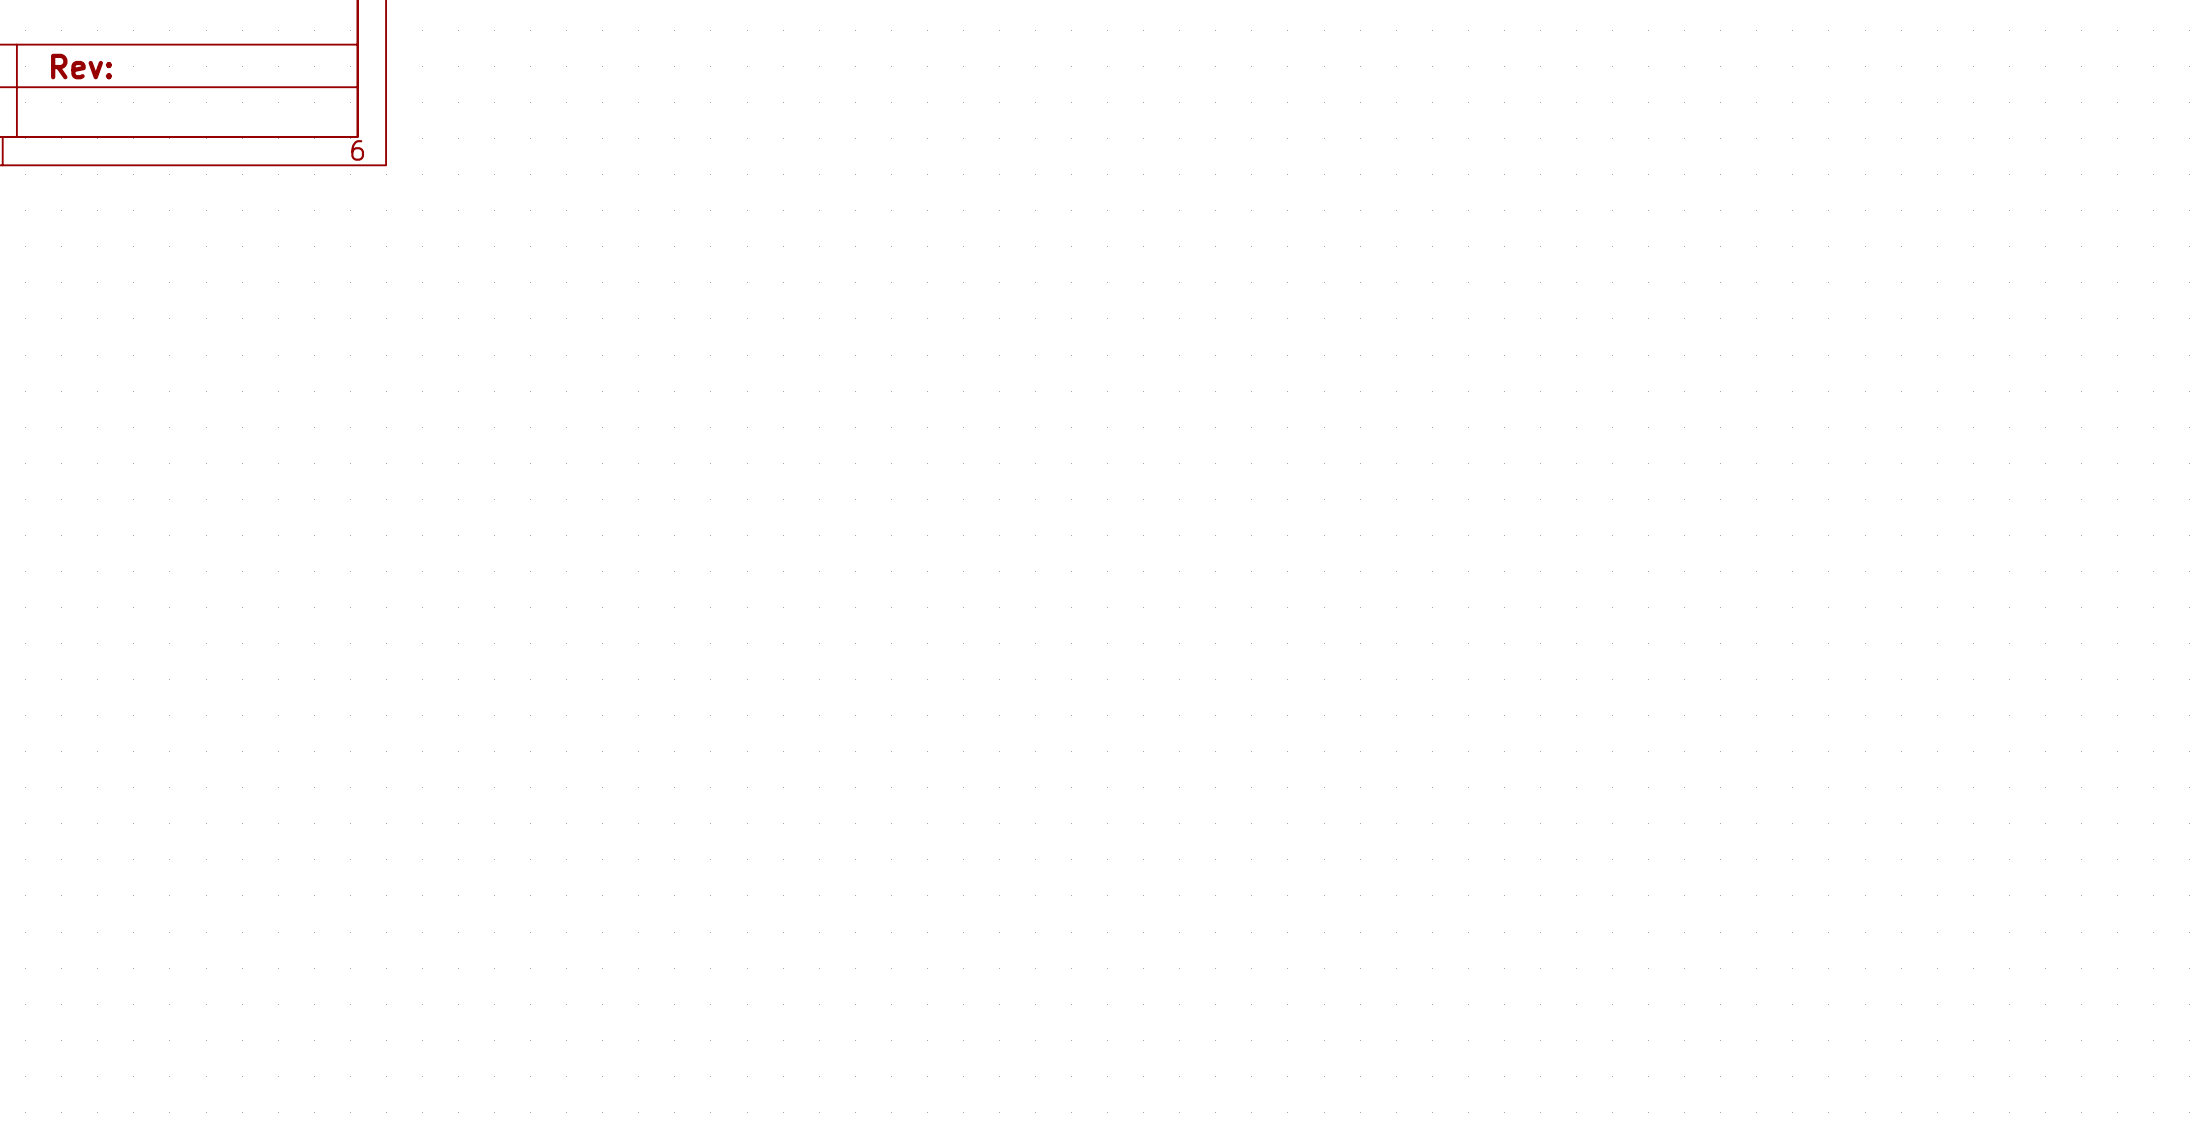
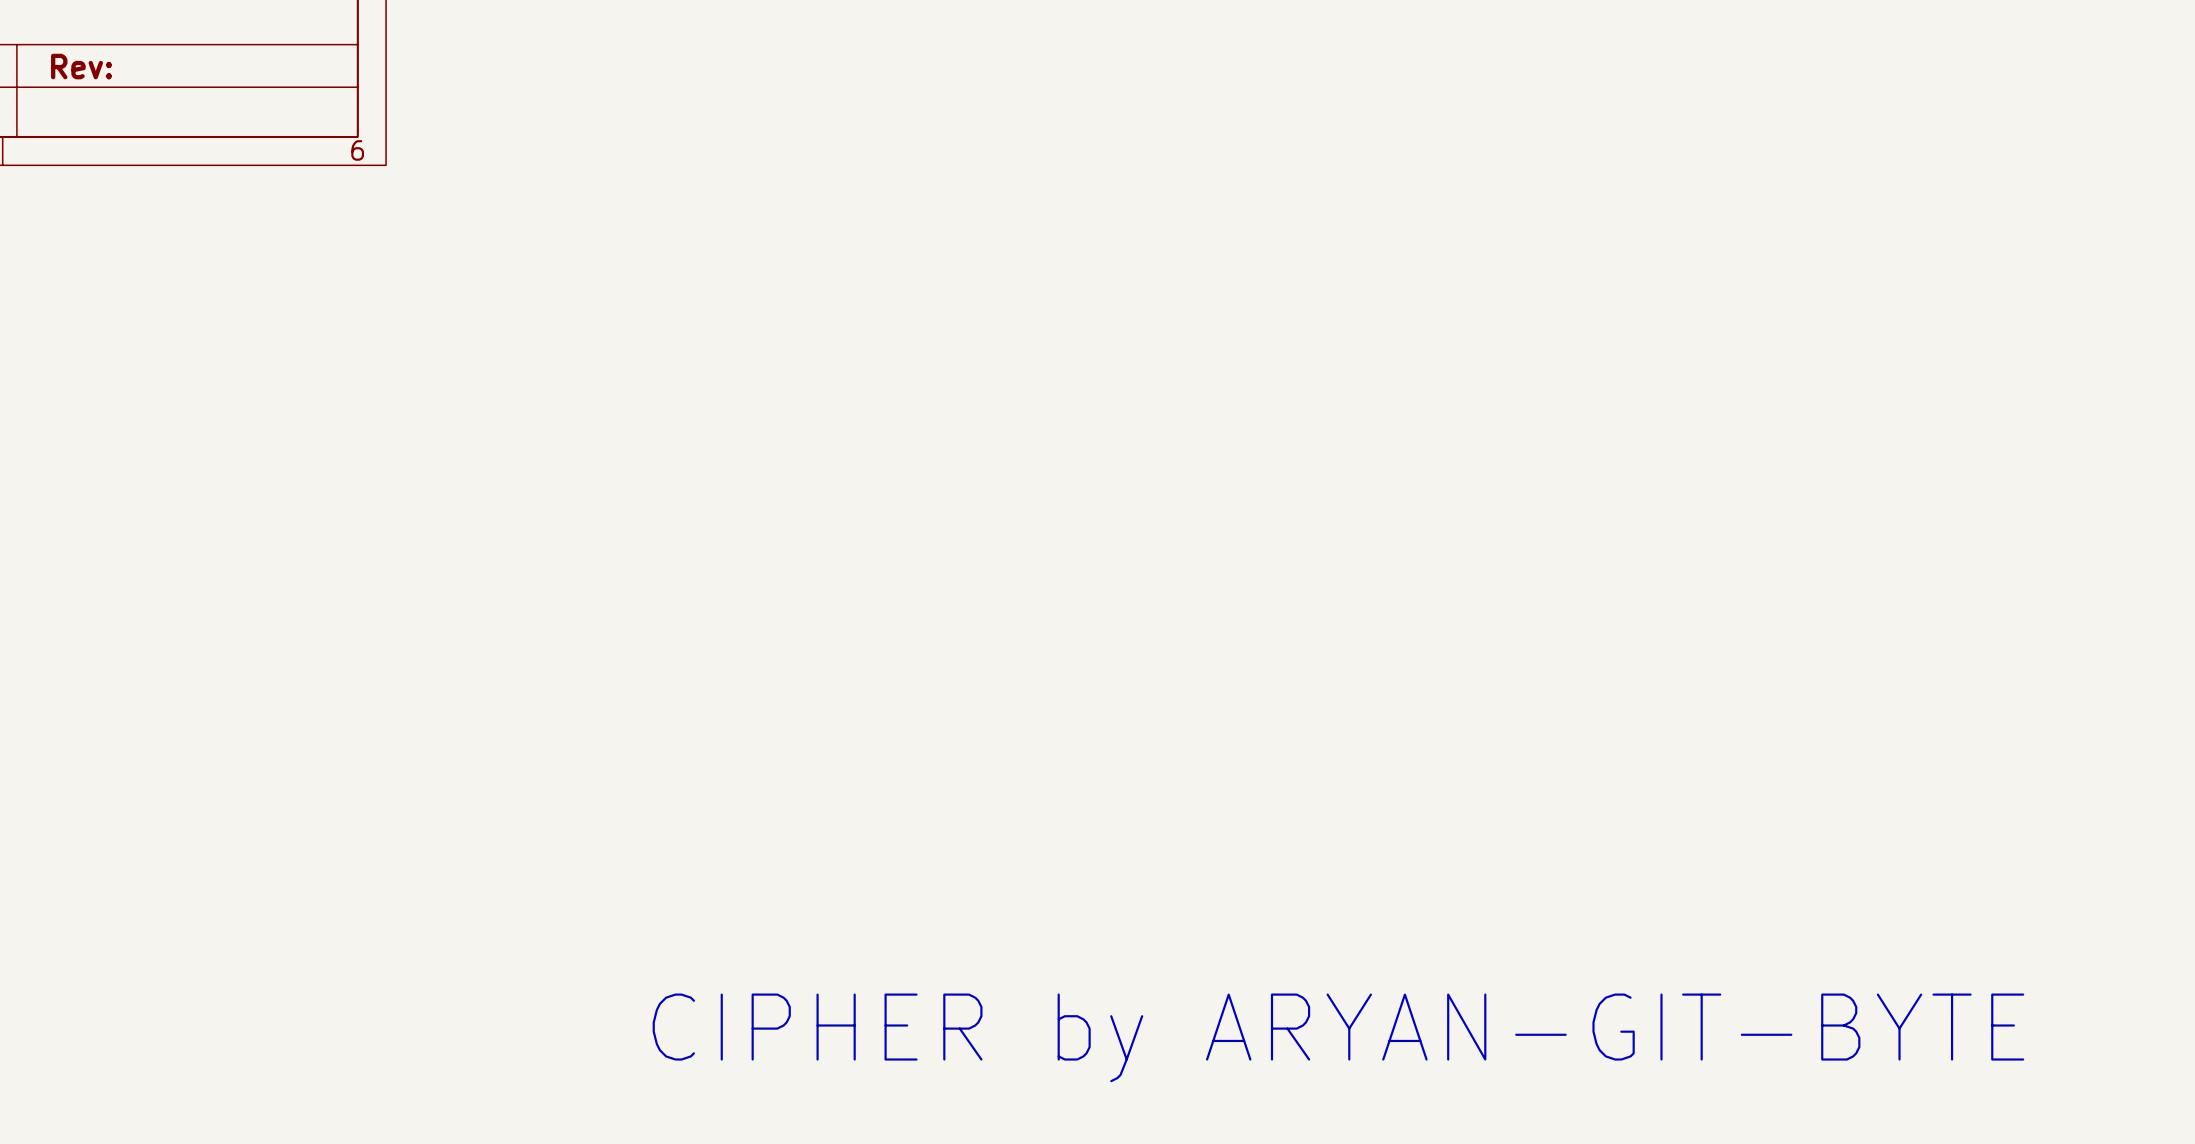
text: none -> CIPHER by ARYAN-GIT-BYTE (1338, 1037)

